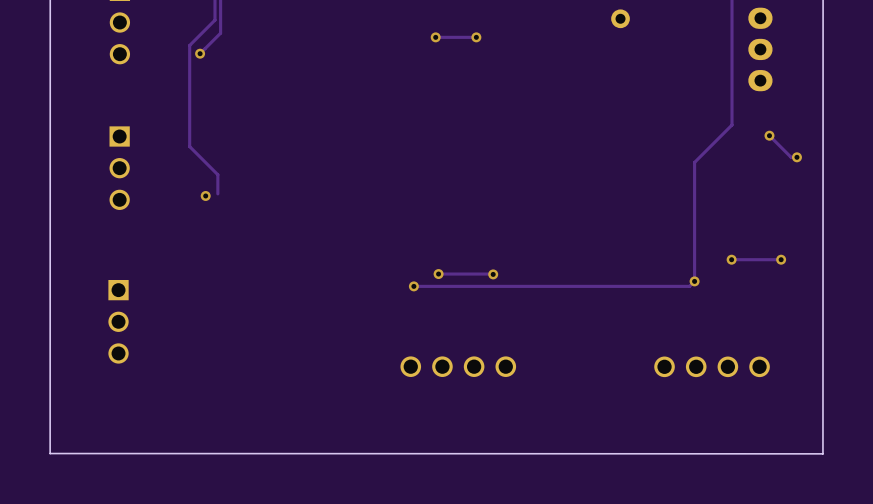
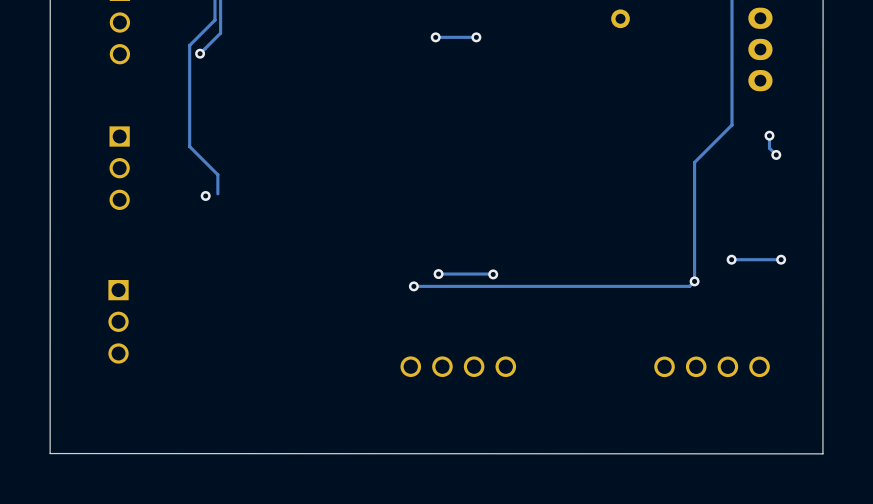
track: (769, 135) (791, 157) (796, 157) -> (769, 135) (769, 148) (776, 154)
via position: (796, 157) -> (776, 154)

